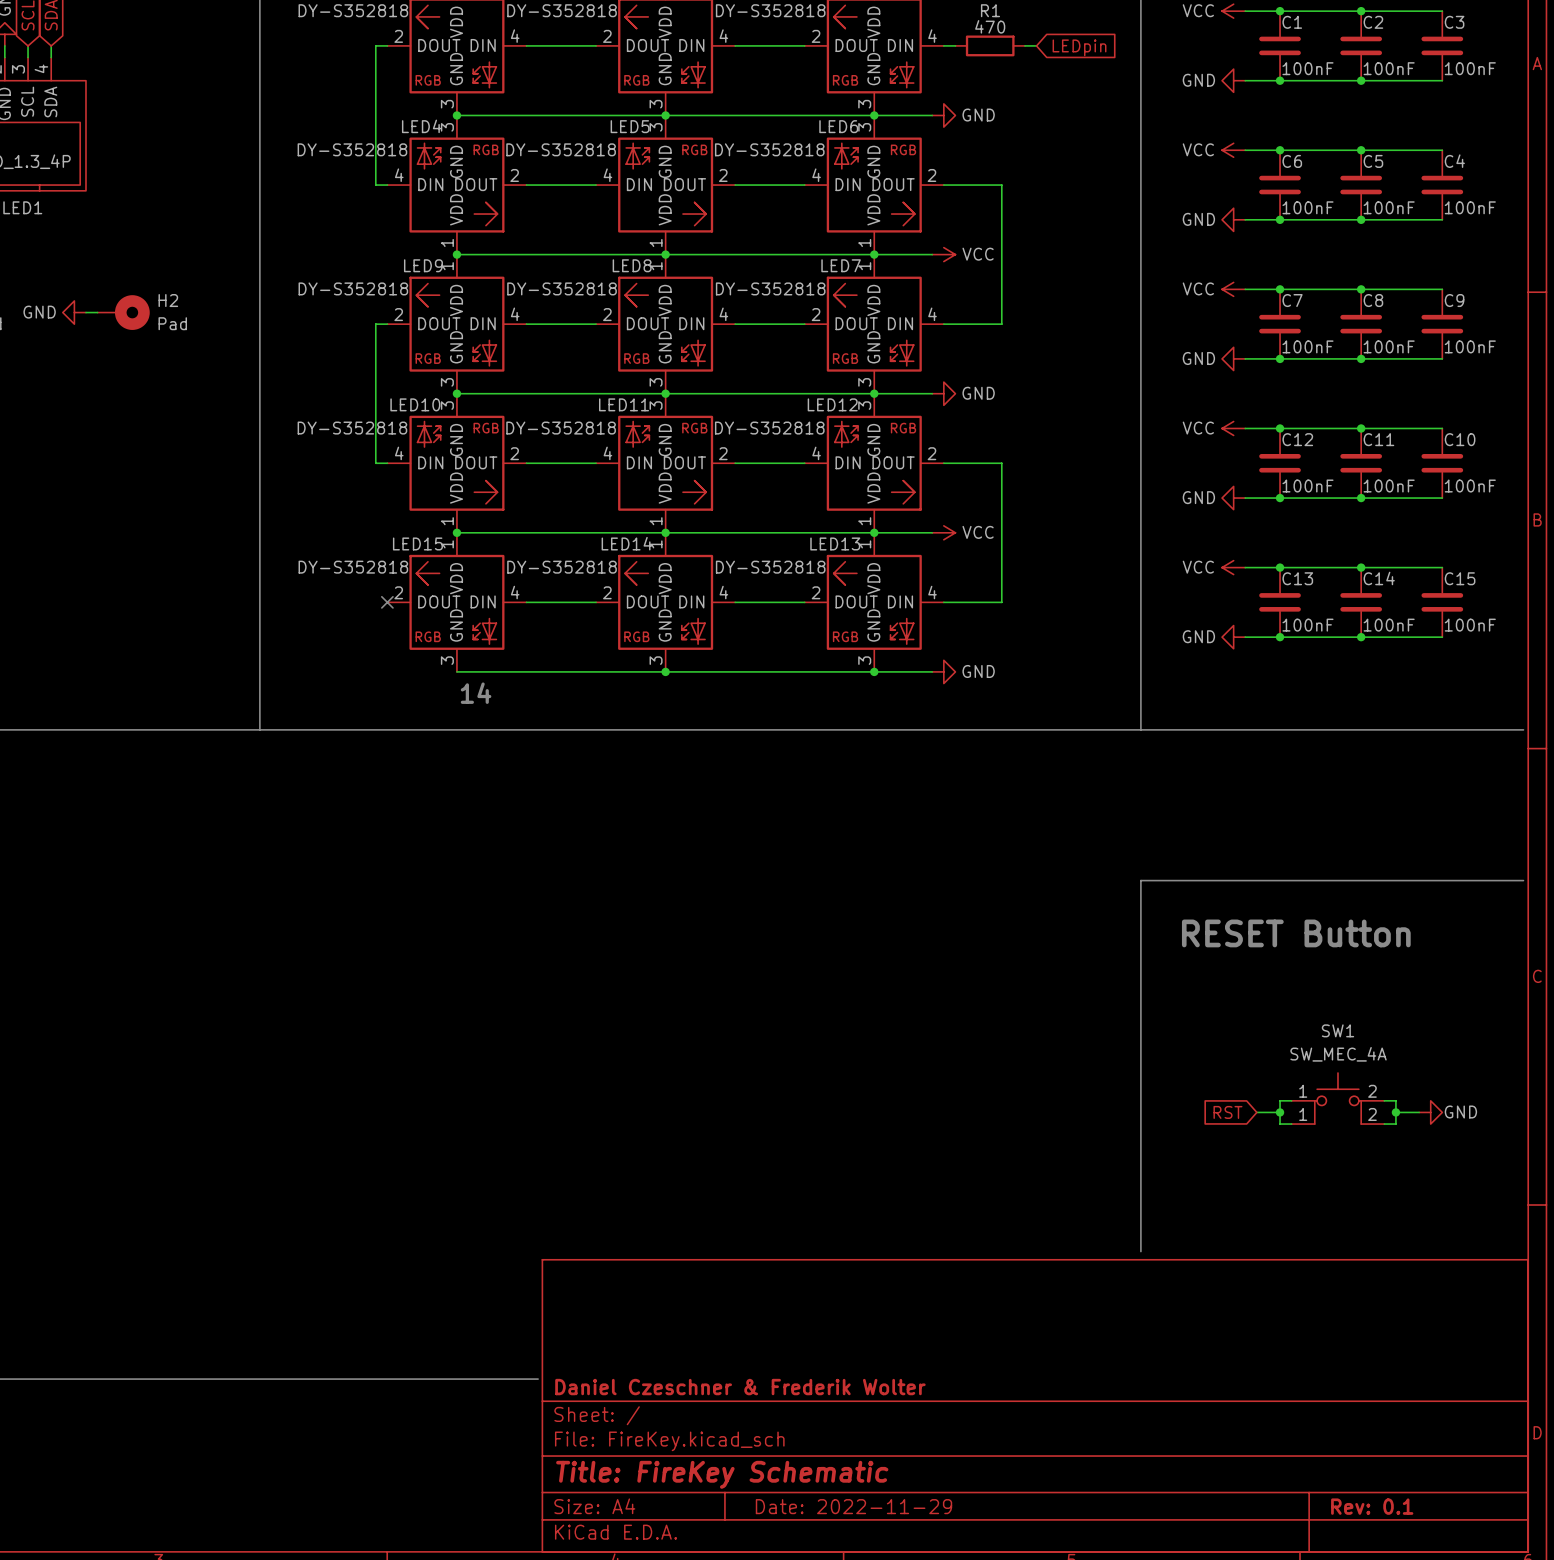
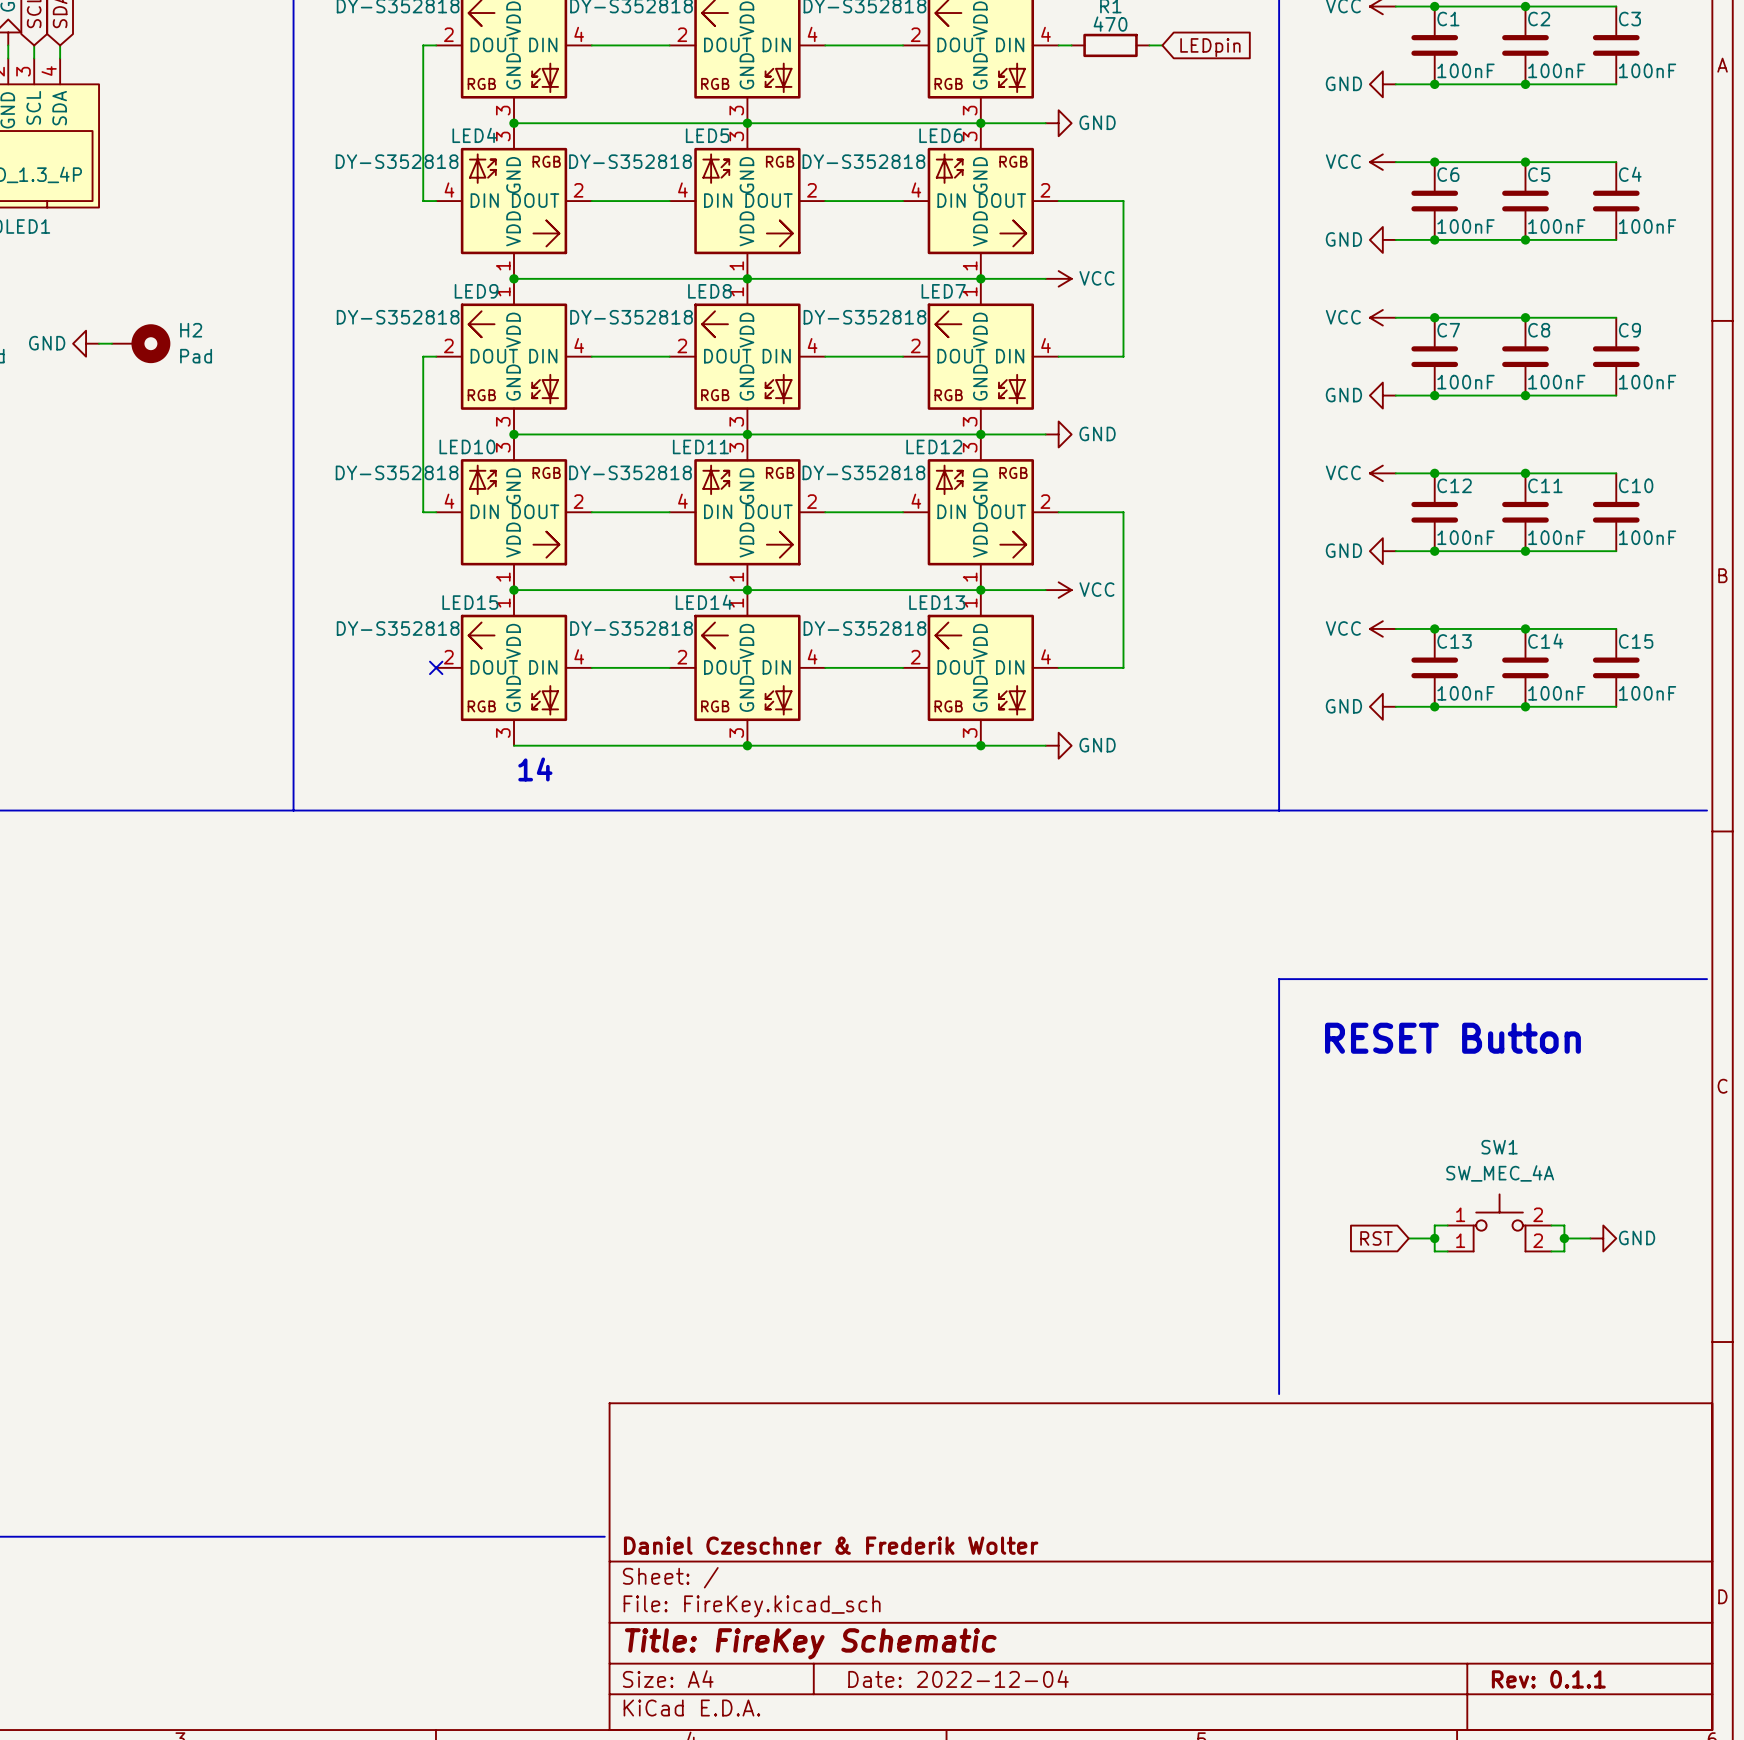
title block: Date: 2022-11-29 (853, 1506) -> Date: 2022-12-04 (958, 1679)
title block: Rev: 0.1 (1372, 1506) -> Rev: 0.1.1 (1548, 1679)

